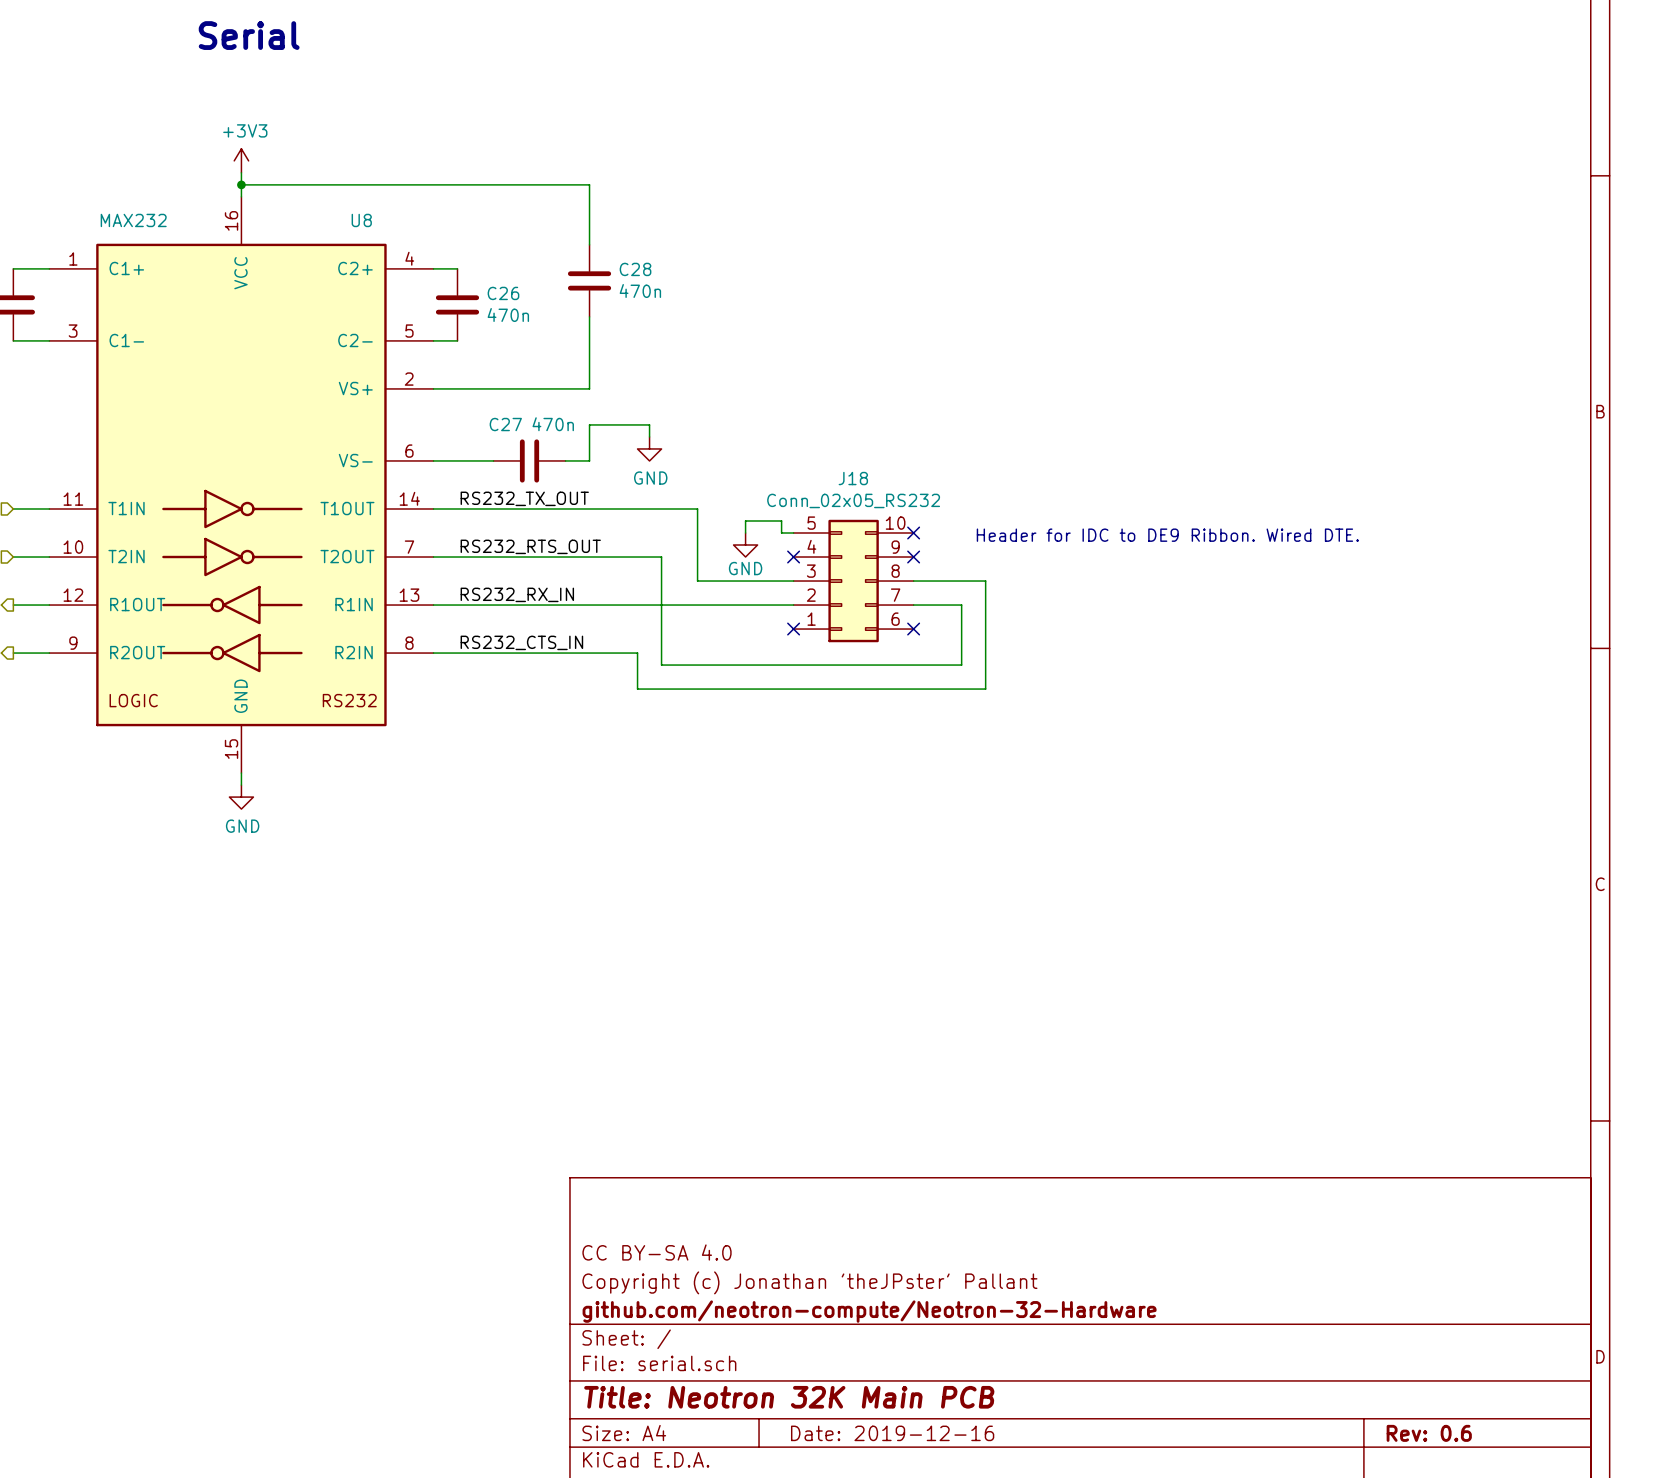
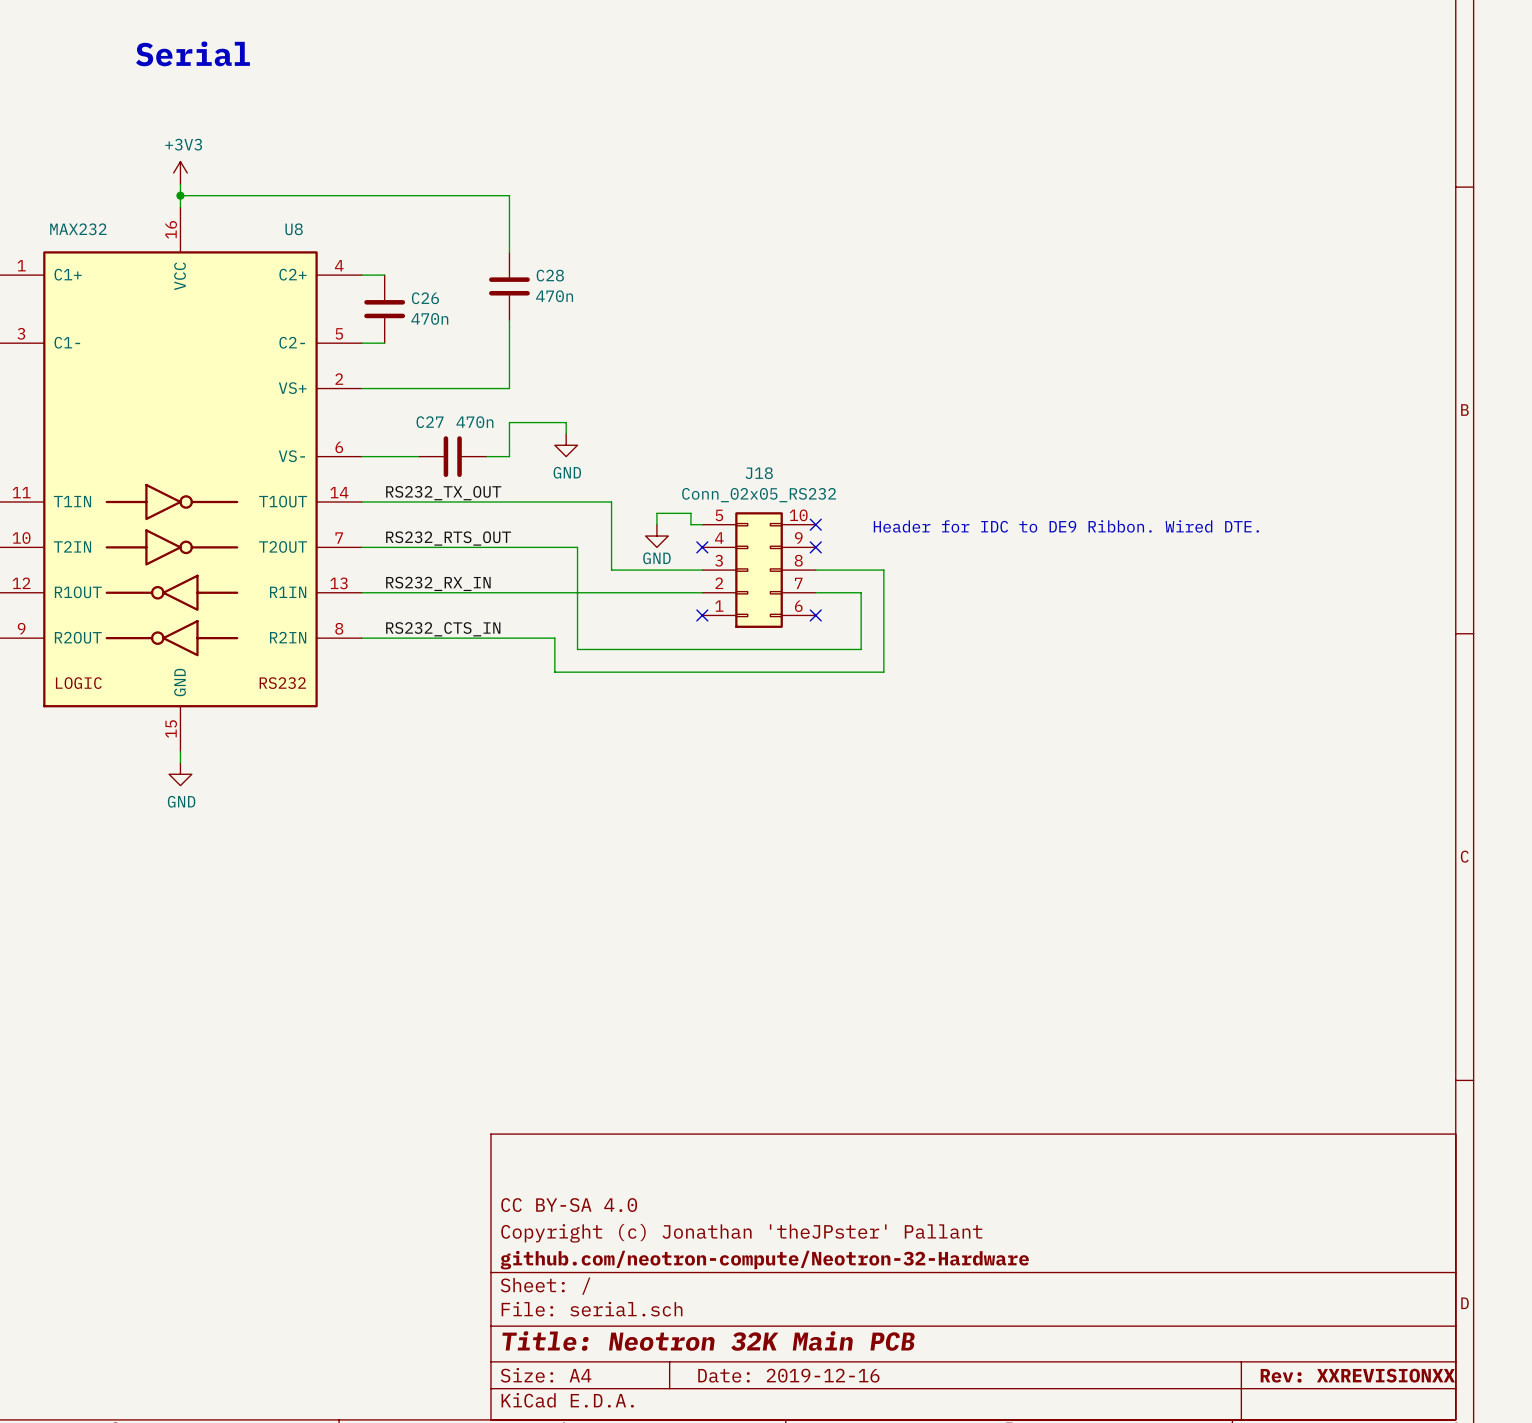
title block: Rev: 0.6 (1429, 1433) -> Rev: XXREVISIONXX (1357, 1375)

